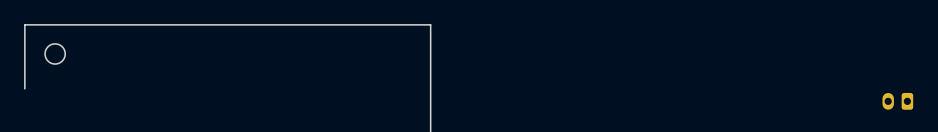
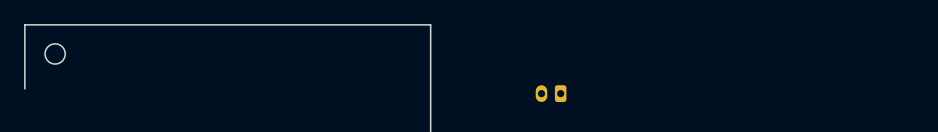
part: none -> (551, 93)
part: (897, 101) -> none

